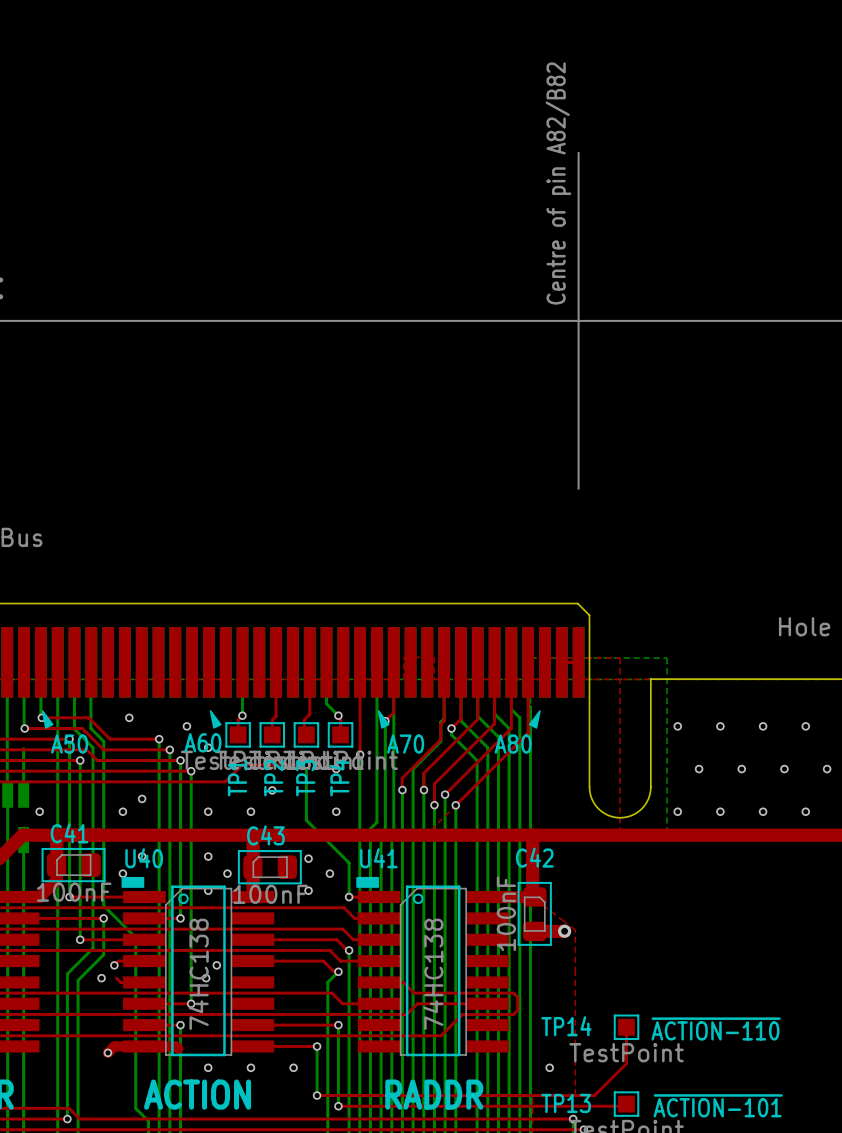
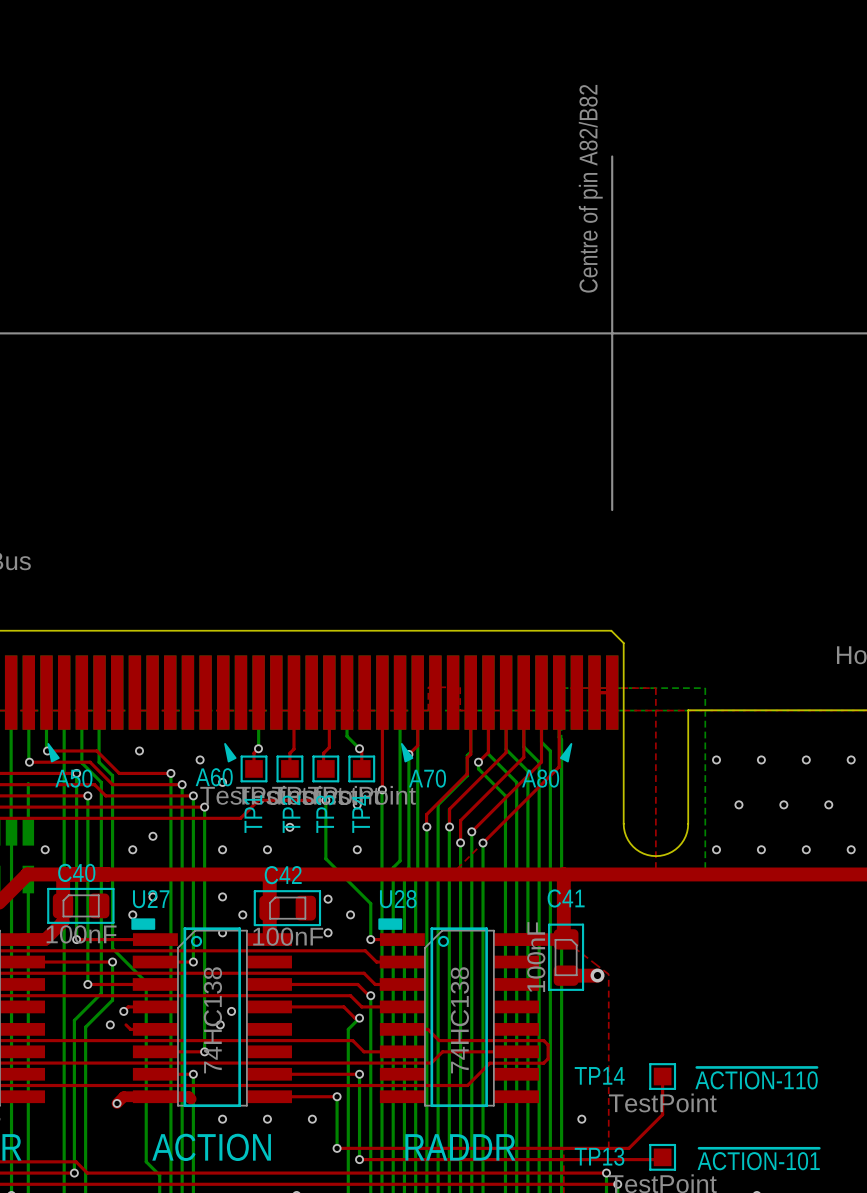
C41 name: C41 (69, 833) -> C40 (76, 872)
C43 name: C43 (265, 835) -> C42 (283, 875)
C42 name: C42 (534, 857) -> C41 (566, 898)
U40 name: U40 (144, 858) -> U27 (151, 899)
U41 name: U41 (378, 858) -> U28 (398, 899)

